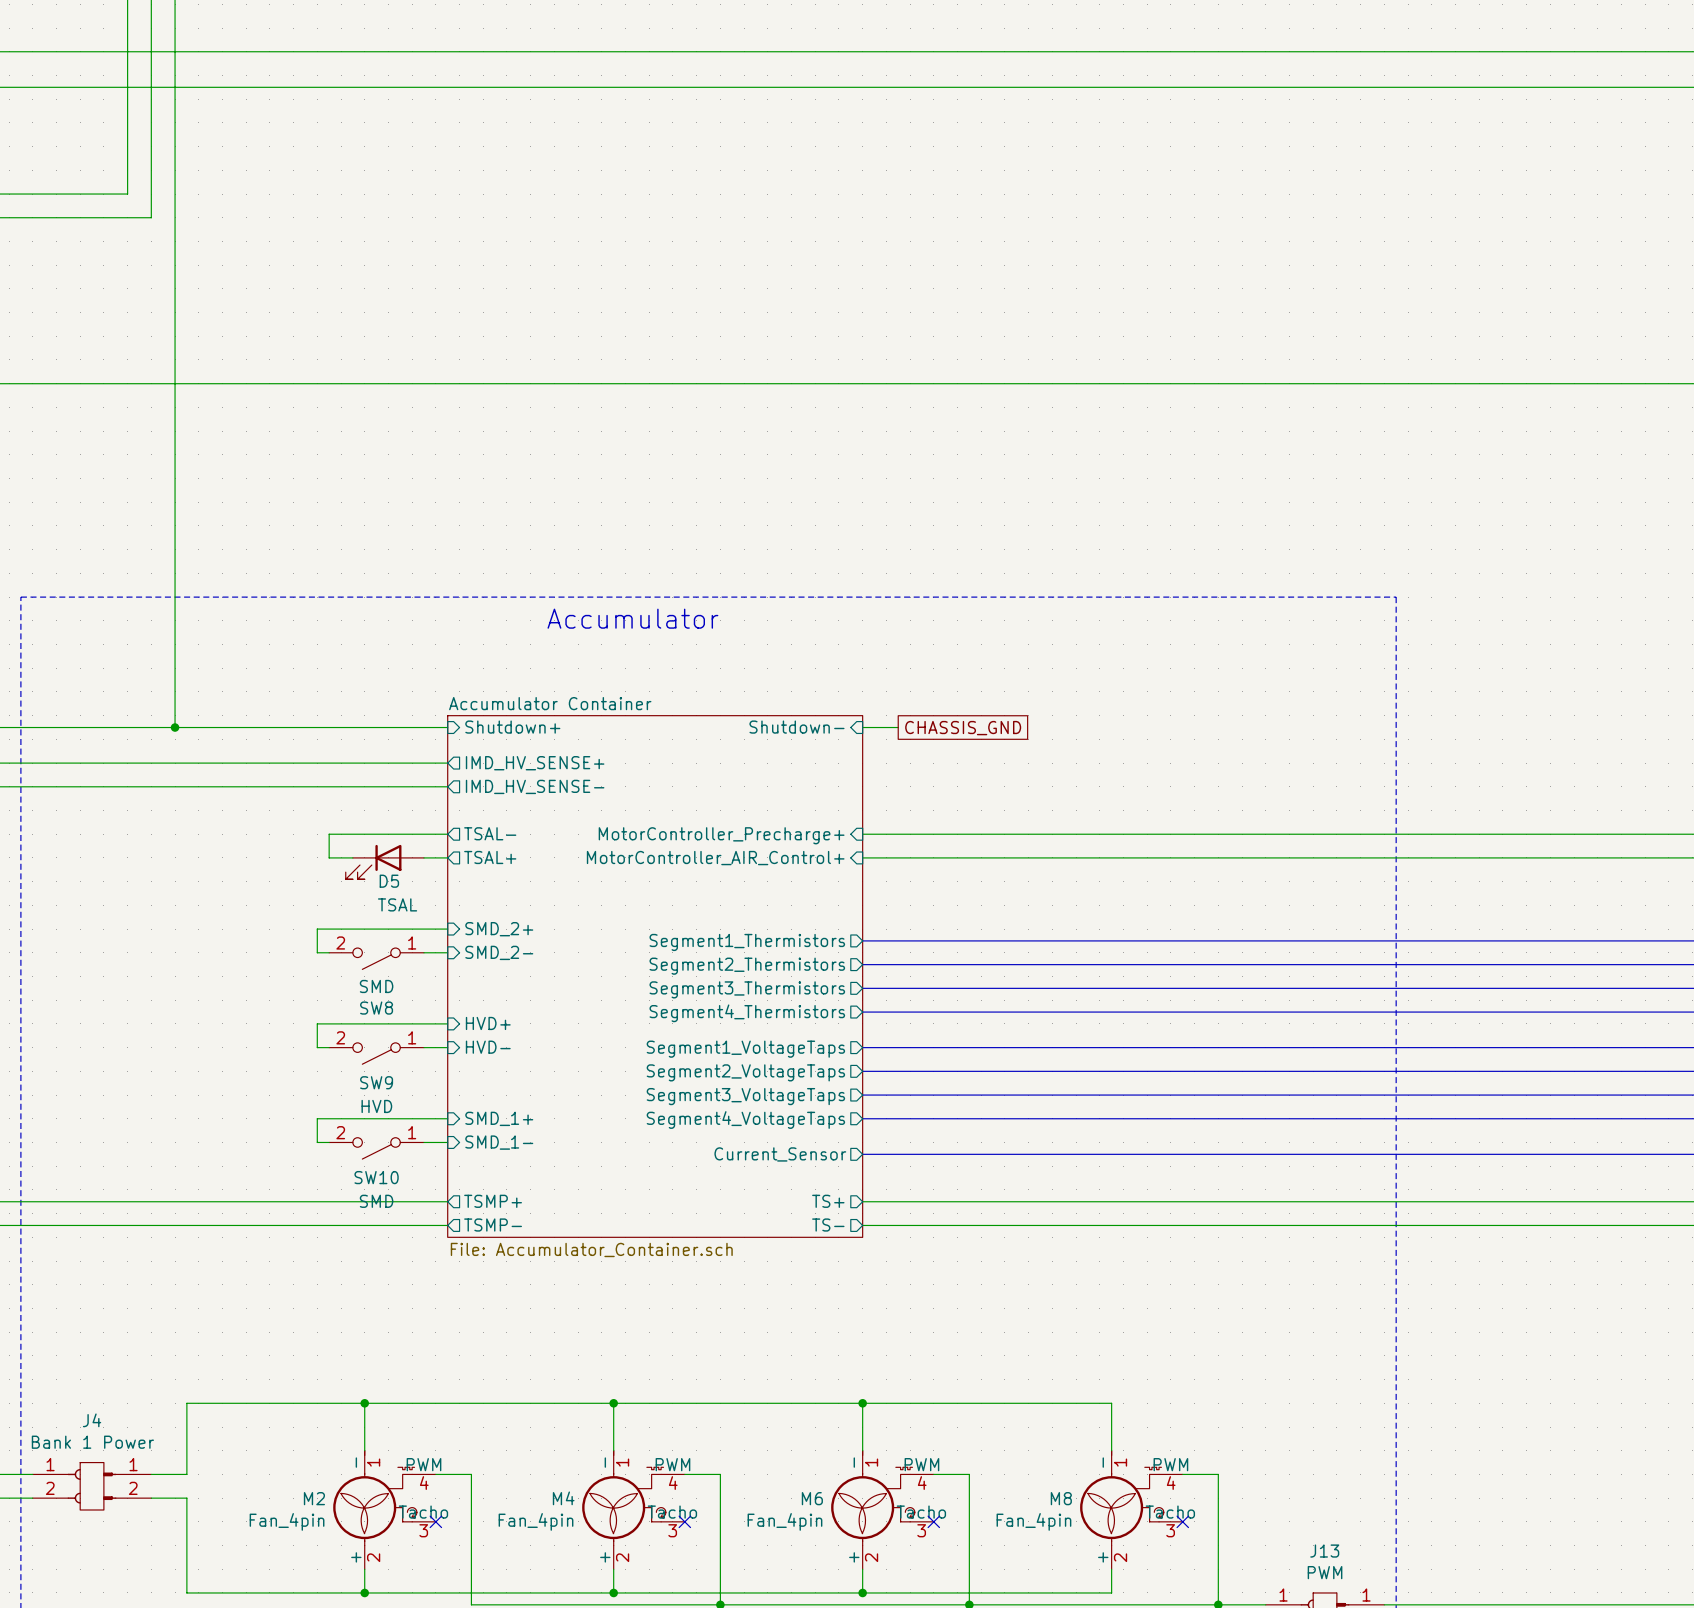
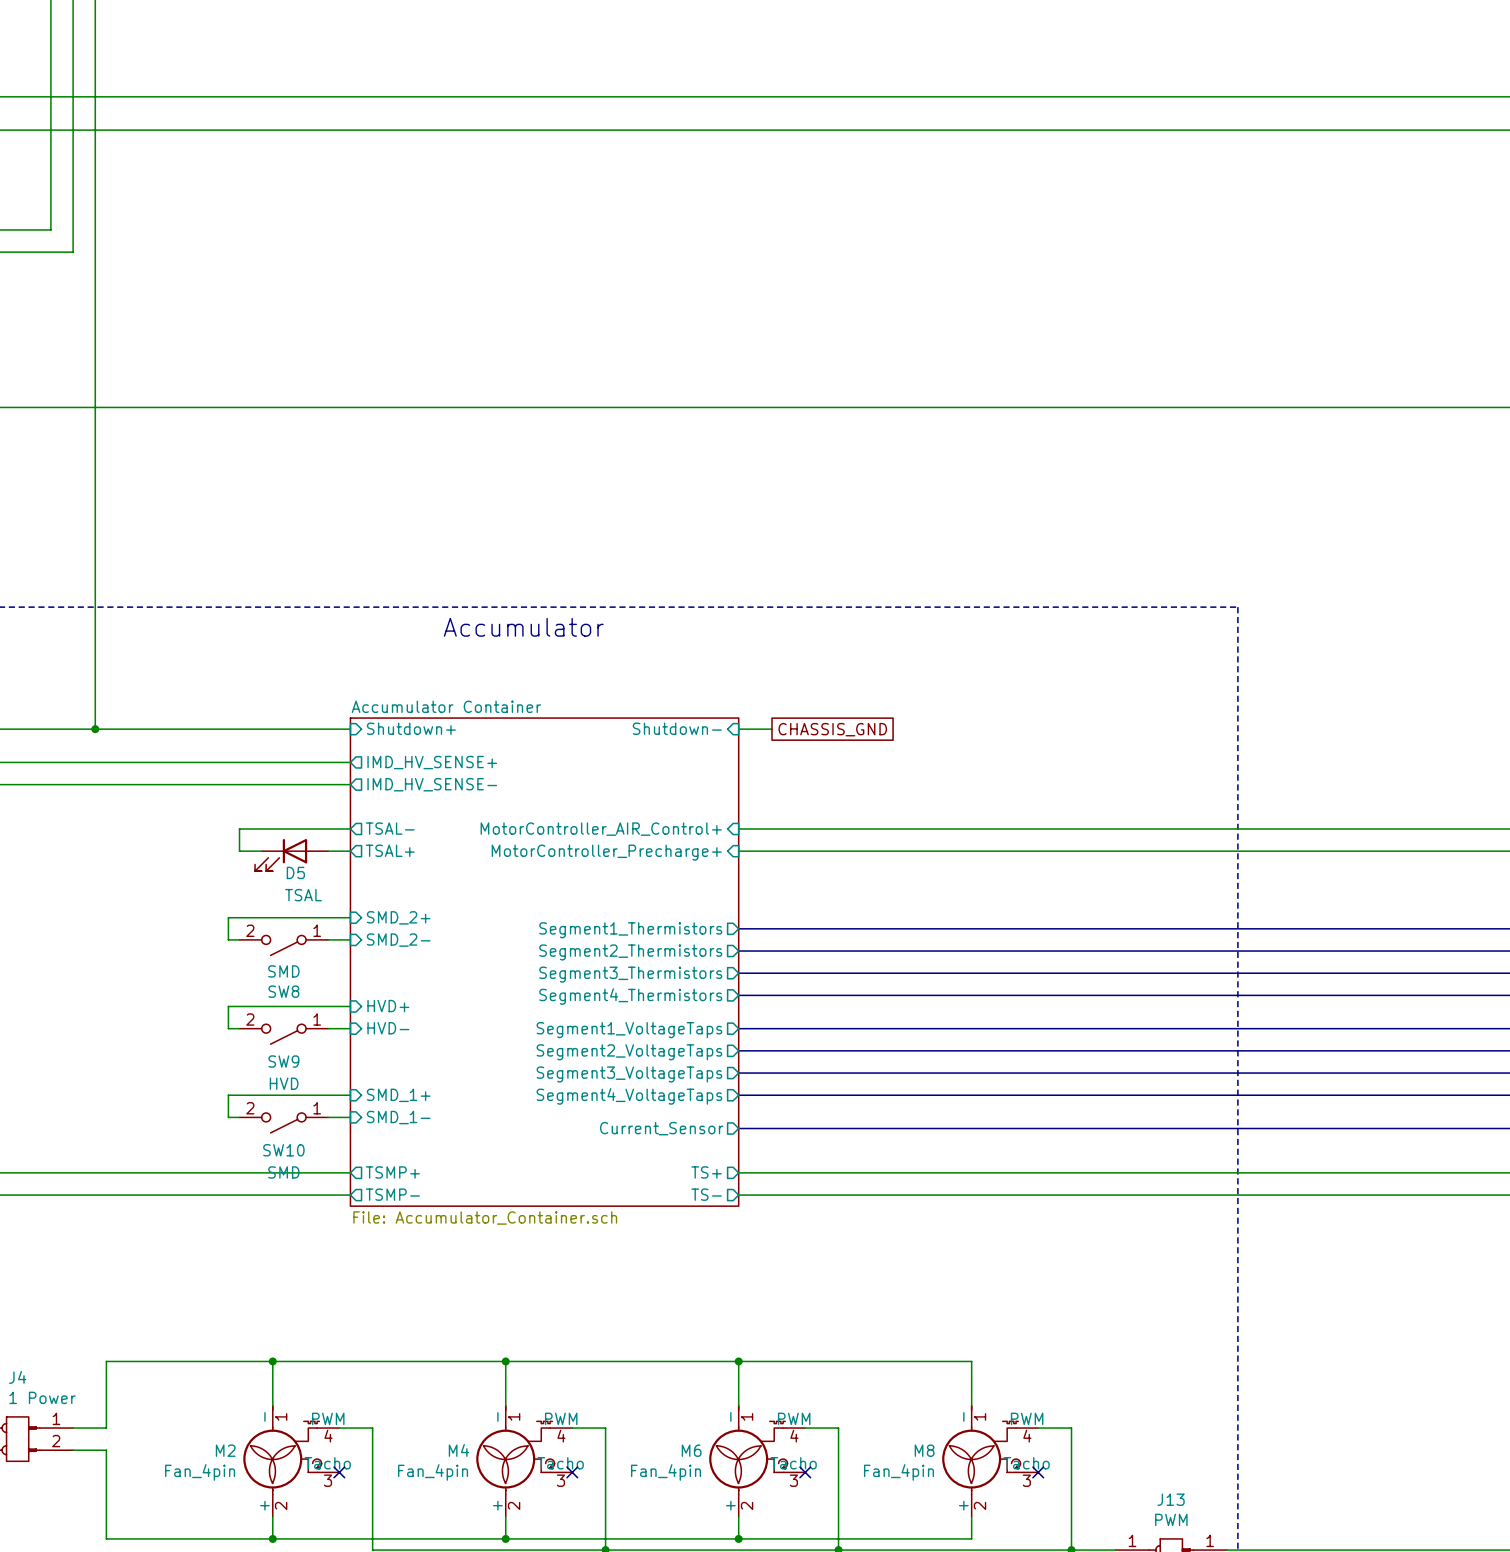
sheet pin: MotorController_Precharge+ (721, 835) -> MotorController_AIR_Control+ (601, 829)
sheet pin: MotorController_AIR_Control+ (715, 858) -> MotorController_Precharge+ (606, 852)

